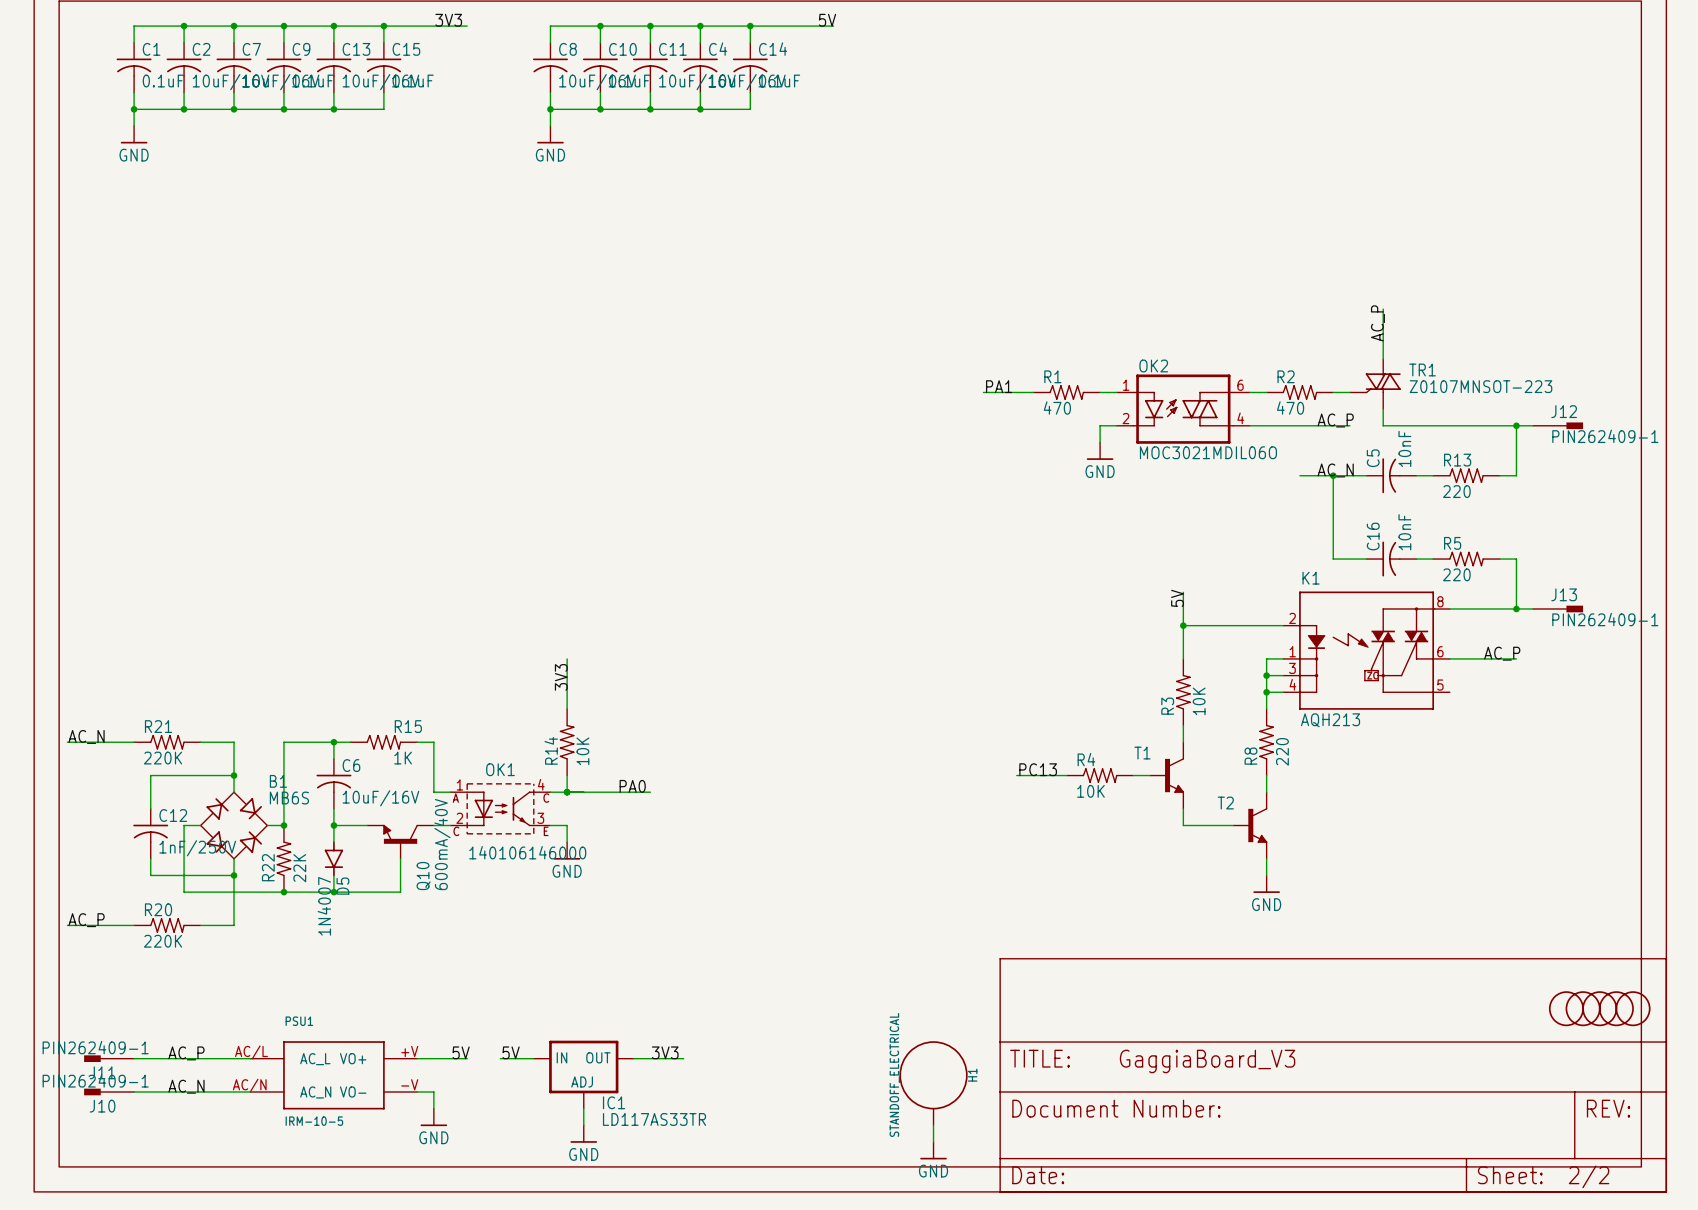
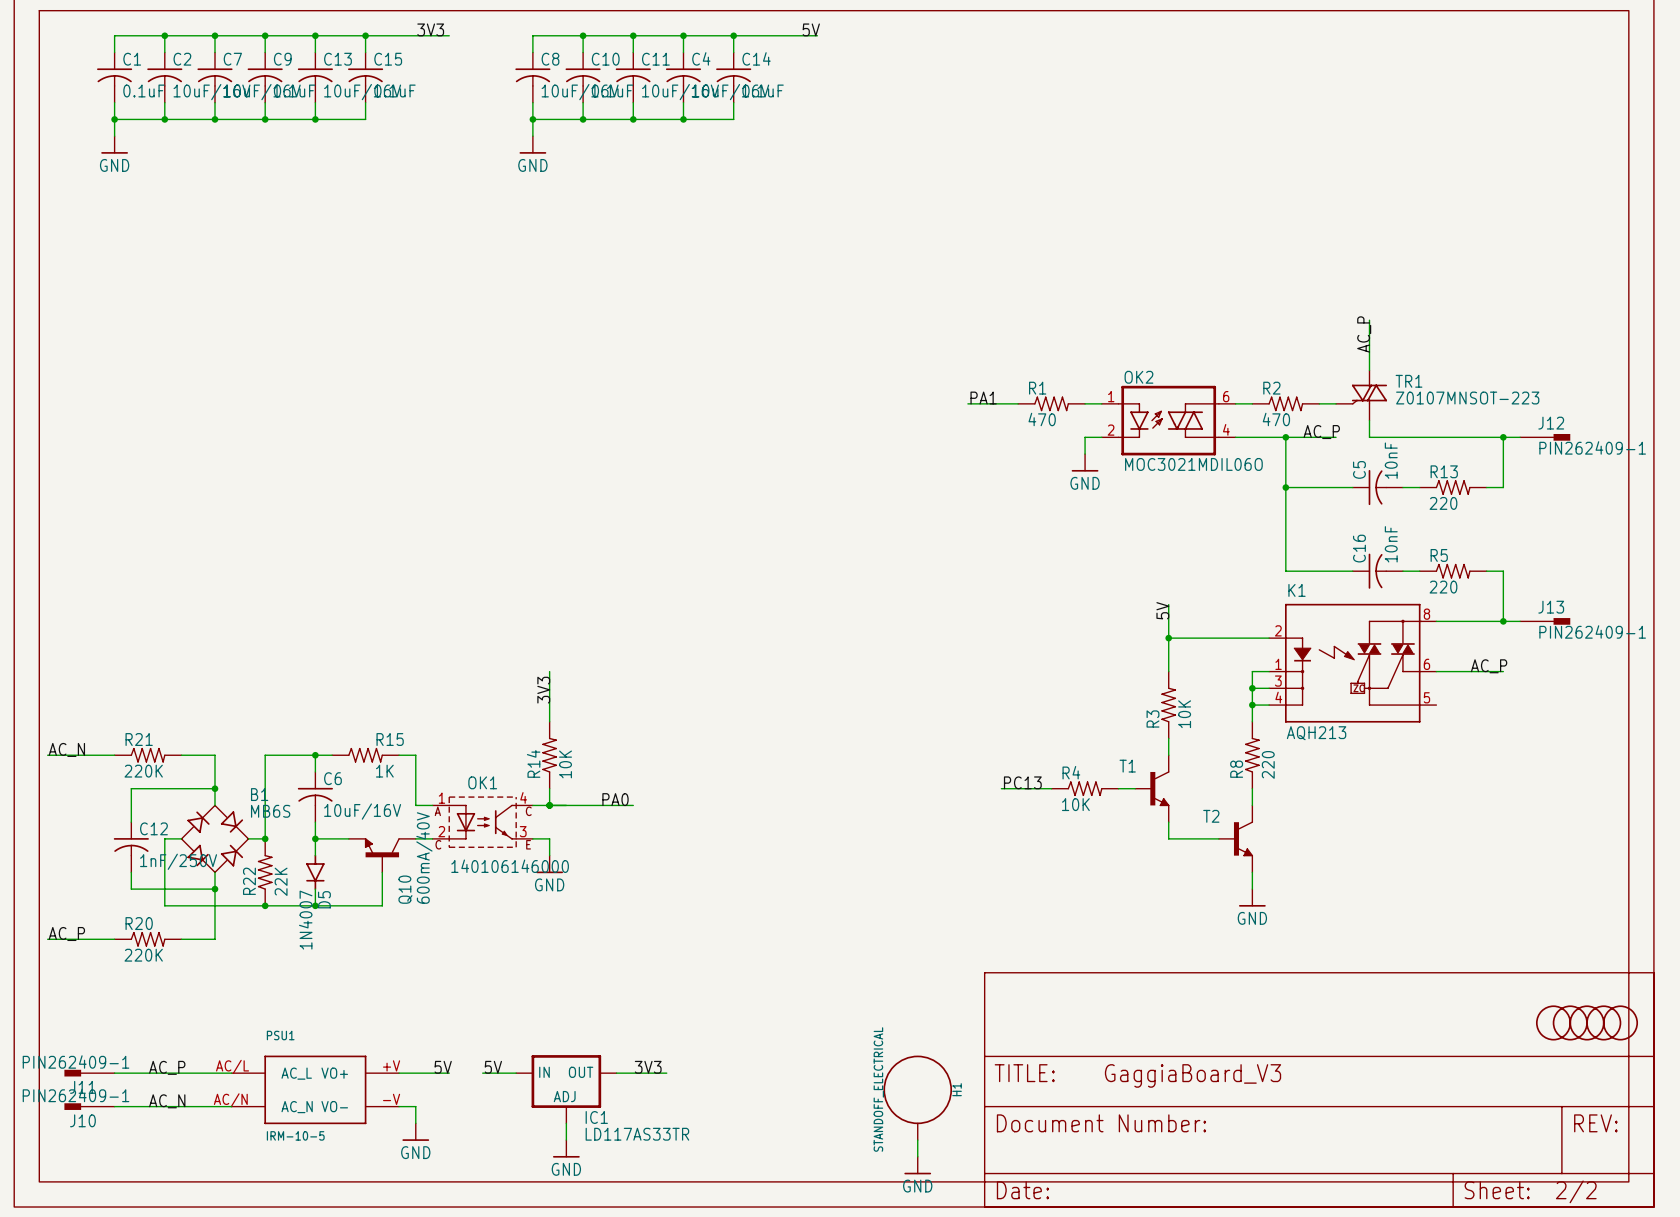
junction: none -> (1285, 437)
label: AC_N (1335, 470) -> none
junction: none -> (1285, 487)
wire: (1333, 475) (1333, 559) -> (1285, 437) (1285, 571) (1319, 571)
junction: (1333, 475) -> none

